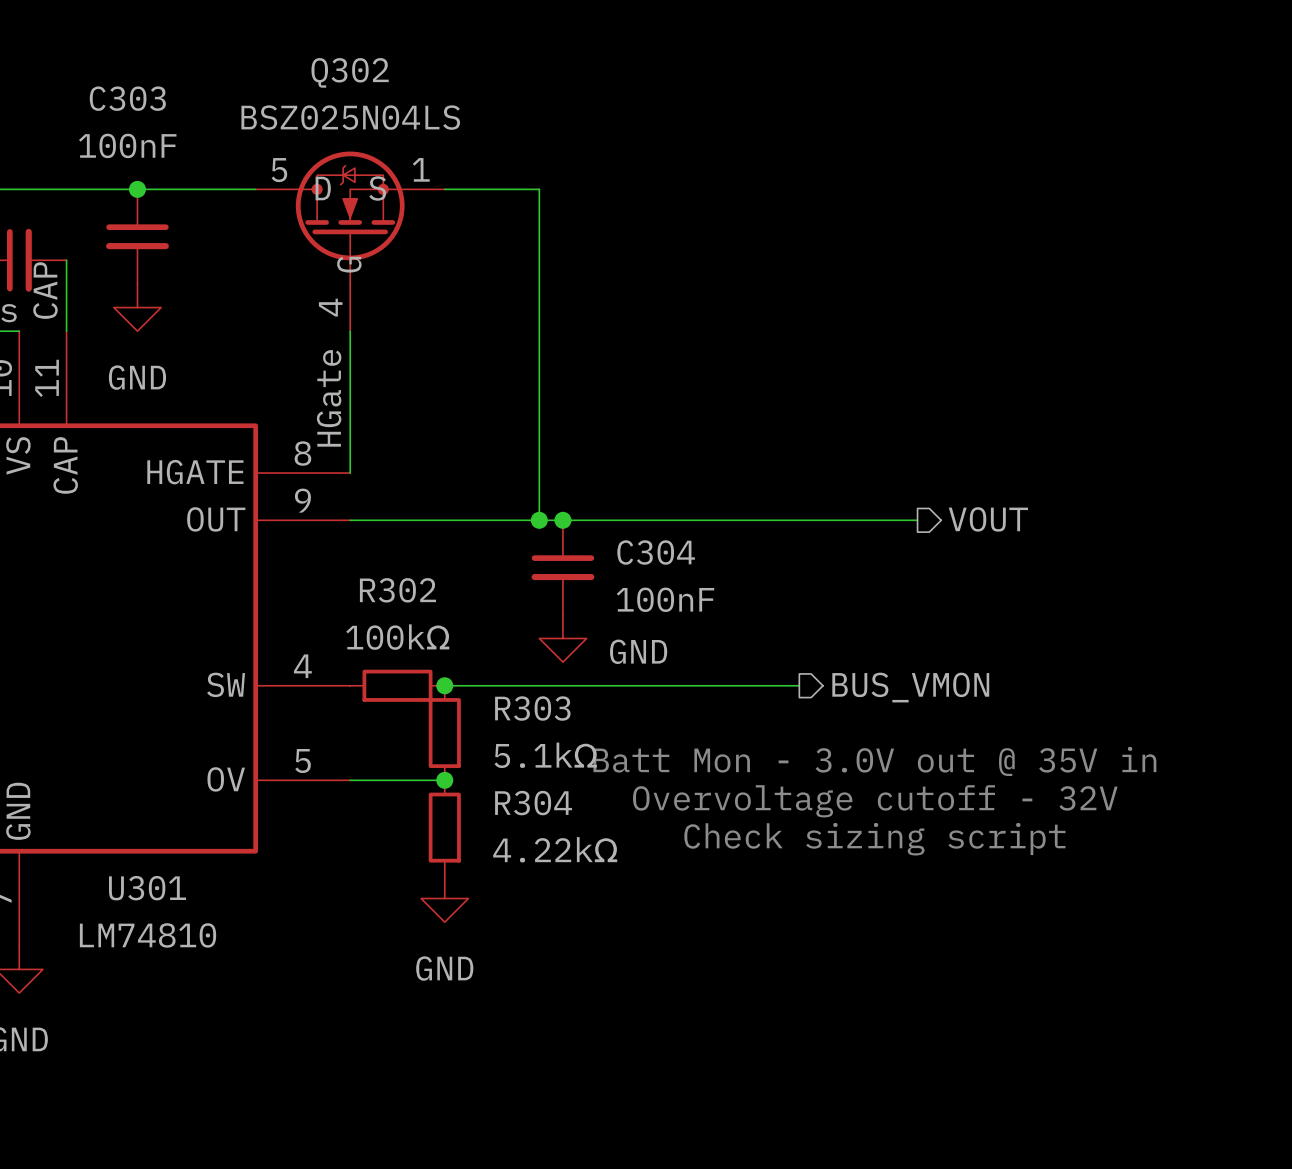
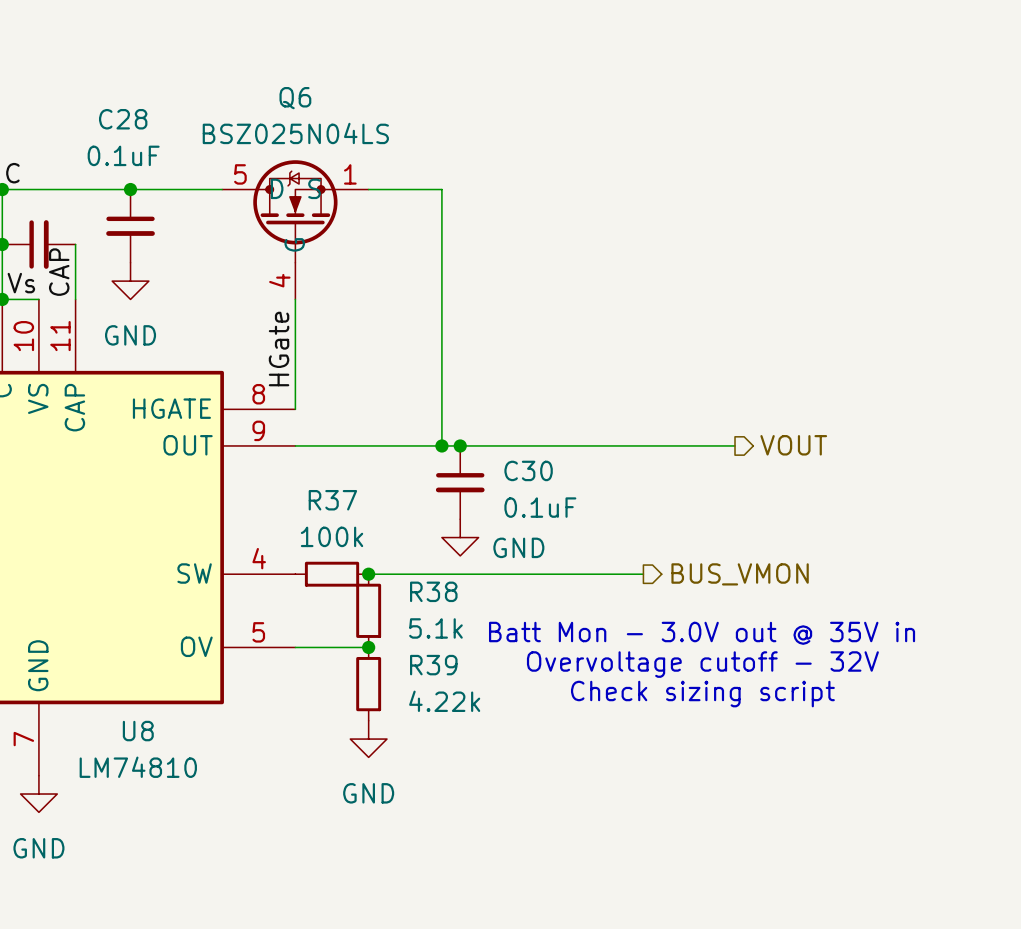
Q302 name: Q302 (350, 72) -> Q6 (295, 98)
C303 name: C303 (127, 98) -> C28 (123, 119)
C303 value: 100nF (127, 145) -> 0.1uF (123, 155)
C304 name: C304 (656, 552) -> C30 (528, 470)
R302 name: R302 (397, 590) -> R37 (332, 500)
C304 value: 100nF (665, 599) -> 0.1uF (540, 507)
R302 value: 100kΩ (397, 637) -> 100k (332, 536)
R303 name: R303 (532, 708) -> R38 (433, 591)
R303 value: 5.1kΩ (545, 755) -> 5.1k (435, 628)
R304 name: R304 (533, 803) -> R39 (433, 665)
R304 value: 4.22kΩ (555, 849) -> 4.22k (444, 701)
U301 name: U301 (147, 888) -> U8 (138, 731)

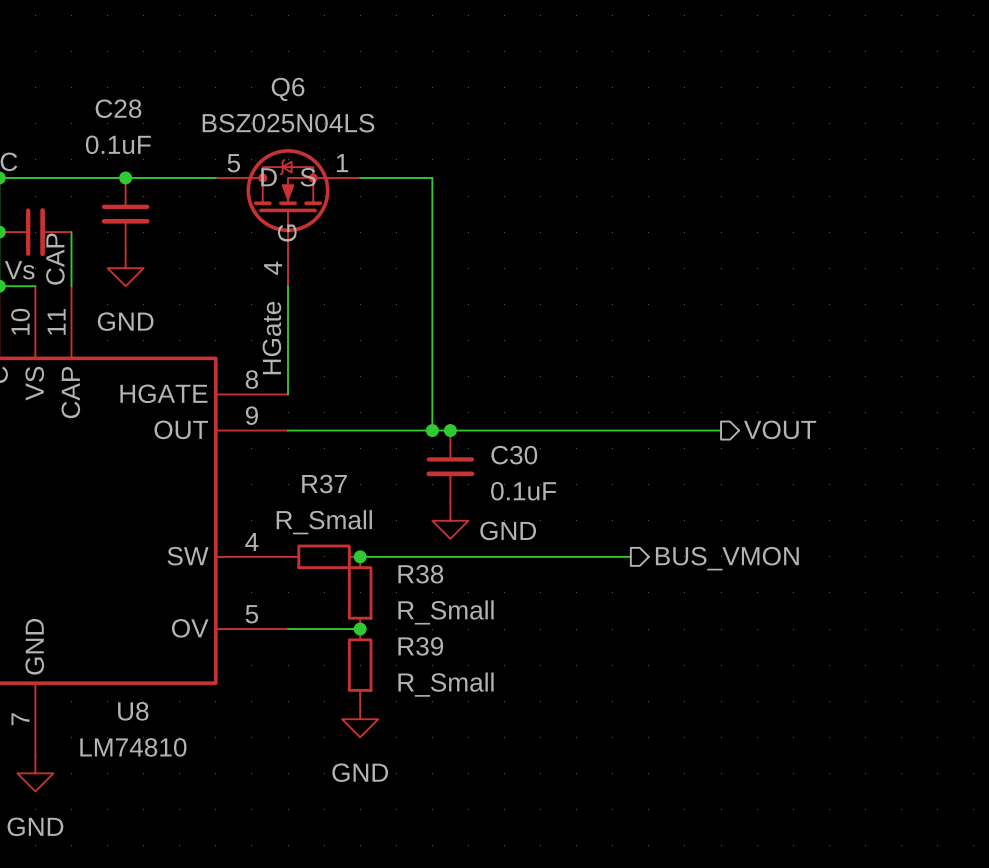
R37 value: 100k (332, 536) -> R_Small (324, 522)
R38 value: 5.1k (435, 628) -> R_Small (446, 612)
text: Batt Mon - 3.0V out @ 35V in (702, 633) -> none
text: Overvoltage cutoff - 32V (702, 664) -> none
text: Check sizing script (702, 694) -> none
R39 value: 4.22k (444, 701) -> R_Small (446, 684)

